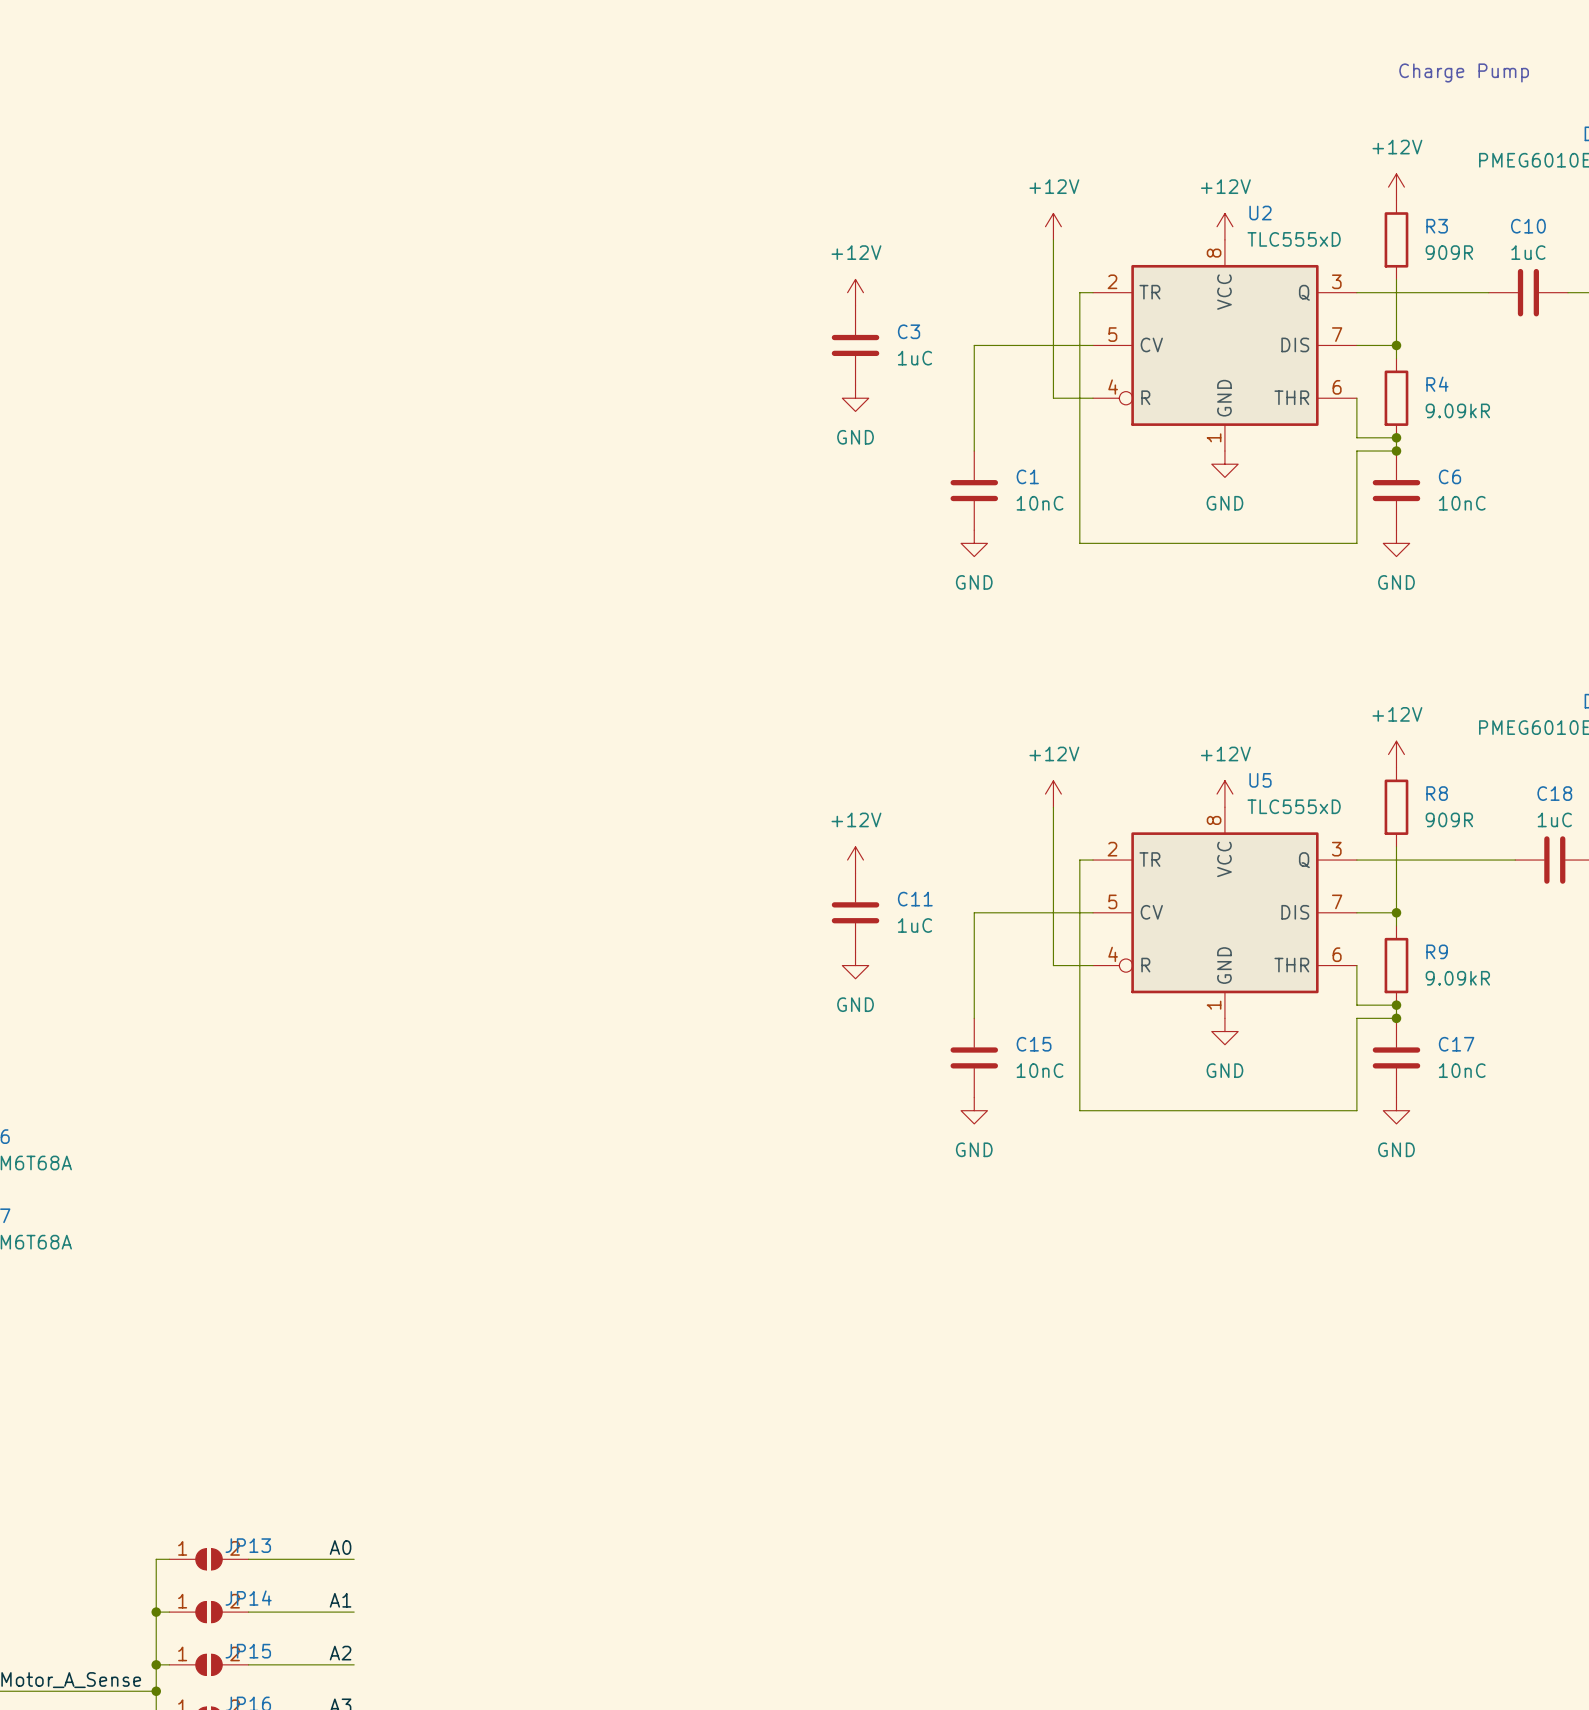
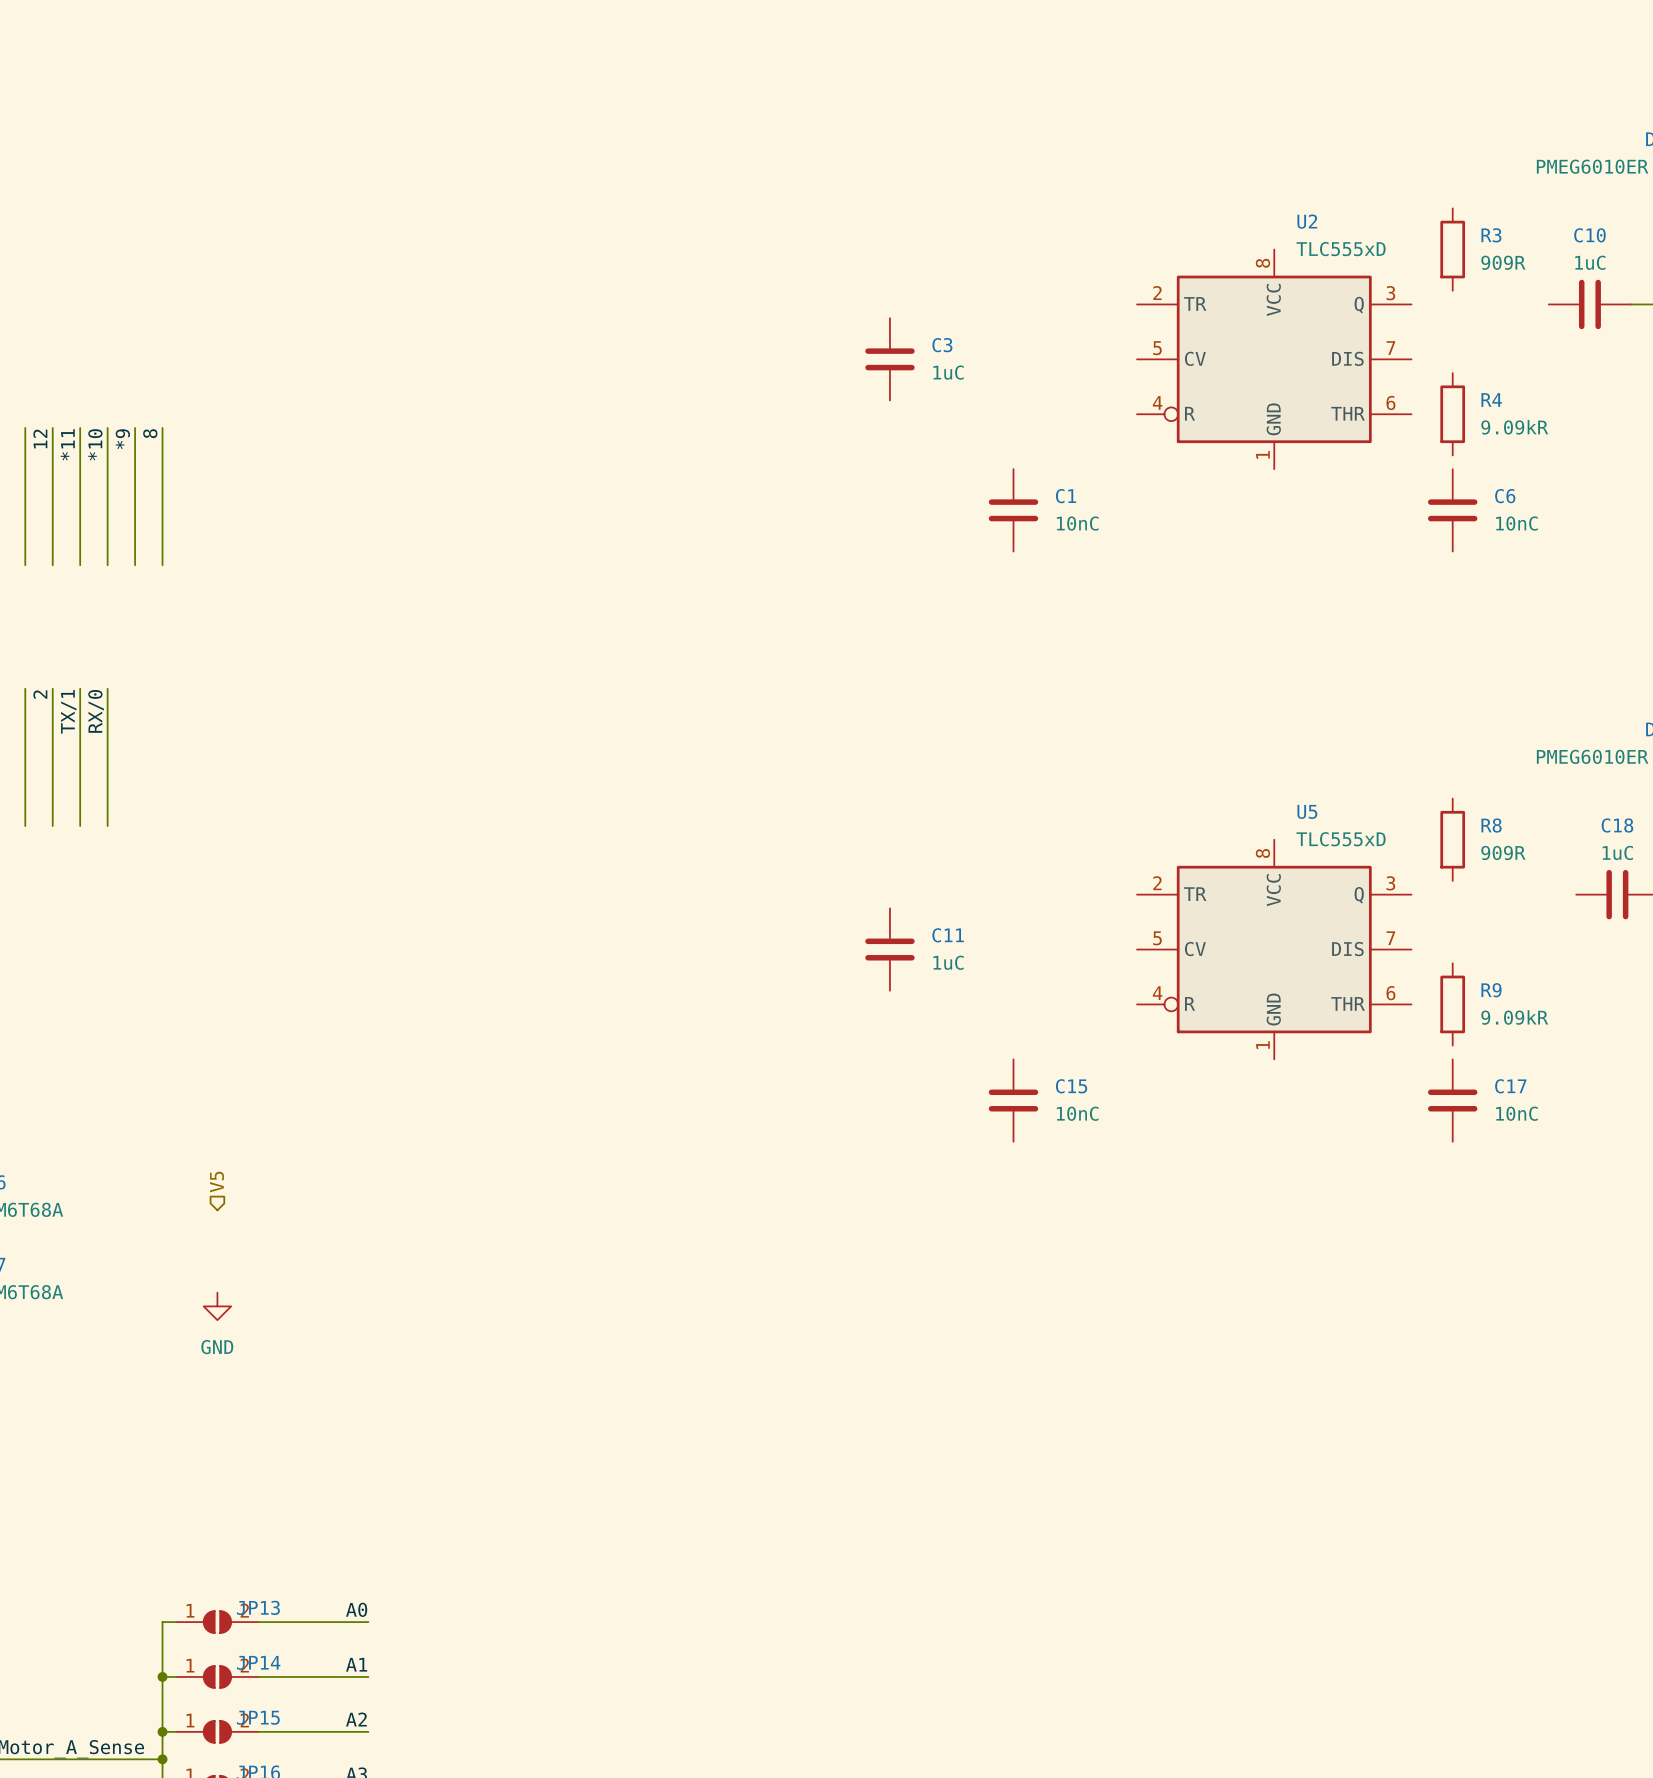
text: Charge Pump (1464, 72) -> none
power symbol: +12V (1396, 187) -> none
power symbol: +12V (1053, 226) -> none
power symbol: +12V (1224, 226) -> none
wire: (1053, 239) (1053, 398) (1093, 398) -> none
wire: (1396, 279) (1396, 358) -> none
power symbol: +12V (855, 292) -> none
wire: (1093, 292) (1079, 292) (1079, 543) (1356, 543) (1356, 451) (1396, 451) (1396, 437) (1356, 437) (1356, 398) -> none
wire: (1356, 292) (1488, 292) -> none
wire: (1093, 345) (974, 345) (974, 451) -> none
wire: (1356, 345) (1396, 345) -> none
junction: (1396, 345) -> none
power symbol: GND (855, 398) -> none
wire: none -> (25, 427) (25, 565)
wire: none -> (52, 427) (52, 565)
wire: none -> (80, 427) (80, 565)
wire: none -> (107, 427) (107, 565)
wire: none -> (135, 427) (135, 565)
wire: none -> (162, 427) (162, 565)
label: none -> 8 (150, 433)
label: none -> *9 (122, 439)
label: none -> 12 (40, 438)
label: none -> *11 (67, 444)
label: none -> *10 (95, 444)
junction: (1396, 437) -> none
junction: (1396, 451) -> none
power symbol: GND (1224, 464) -> none
power symbol: GND (974, 543) -> none
power symbol: GND (1396, 543) -> none
wire: none -> (25, 688) (25, 826)
wire: none -> (52, 688) (52, 826)
wire: none -> (80, 688) (80, 826)
wire: none -> (107, 688) (107, 826)
label: none -> 2 (40, 694)
label: none -> TX/1 (68, 711)
label: none -> RX/0 (96, 711)
power symbol: +12V (1396, 754) -> none
power symbol: +12V (1053, 794) -> none
power symbol: +12V (1224, 794) -> none
wire: (1053, 807) (1053, 965) (1093, 965) -> none
wire: (1396, 846) (1396, 925) -> none
power symbol: +12V (855, 860) -> none
wire: (1093, 860) (1079, 860) (1079, 1110) (1356, 1110) (1356, 1018) (1396, 1018) (1396, 1005) (1356, 1005) (1356, 965) -> none
wire: (1356, 860) (1515, 860) -> none
wire: (1093, 912) (974, 912) (974, 1018) -> none
wire: (1356, 912) (1396, 912) -> none
junction: (1396, 912) -> none
power symbol: GND (855, 965) -> none
junction: (1396, 1005) -> none
junction: (1396, 1018) -> none
power symbol: GND (1224, 1031) -> none
power symbol: GND (974, 1110) -> none
power symbol: GND (1396, 1110) -> none
hierarchical label: none -> V5 (217, 1182)
power symbol: none -> GND (217, 1306)

